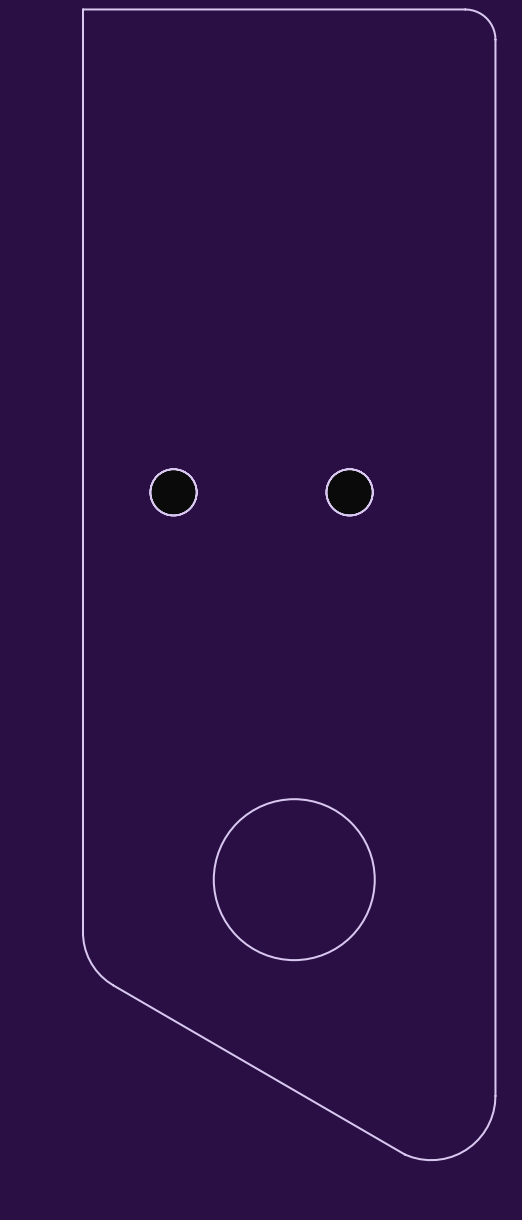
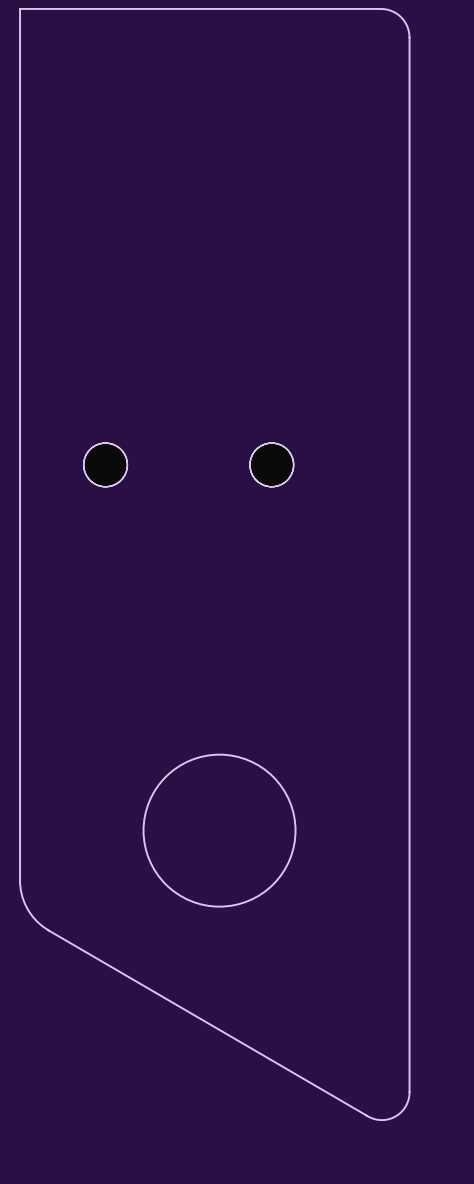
board edge: (113, 985) (412, 1157) (428, 1160) (444, 1158) (466, 1149) (478, 1139) (487, 1126) (493, 1111) (495, 1095) -> (48, 930) (372, 1118) (382, 1120) (392, 1118) (400, 1112) (406, 1104) (409, 1095) (409, 1034)

